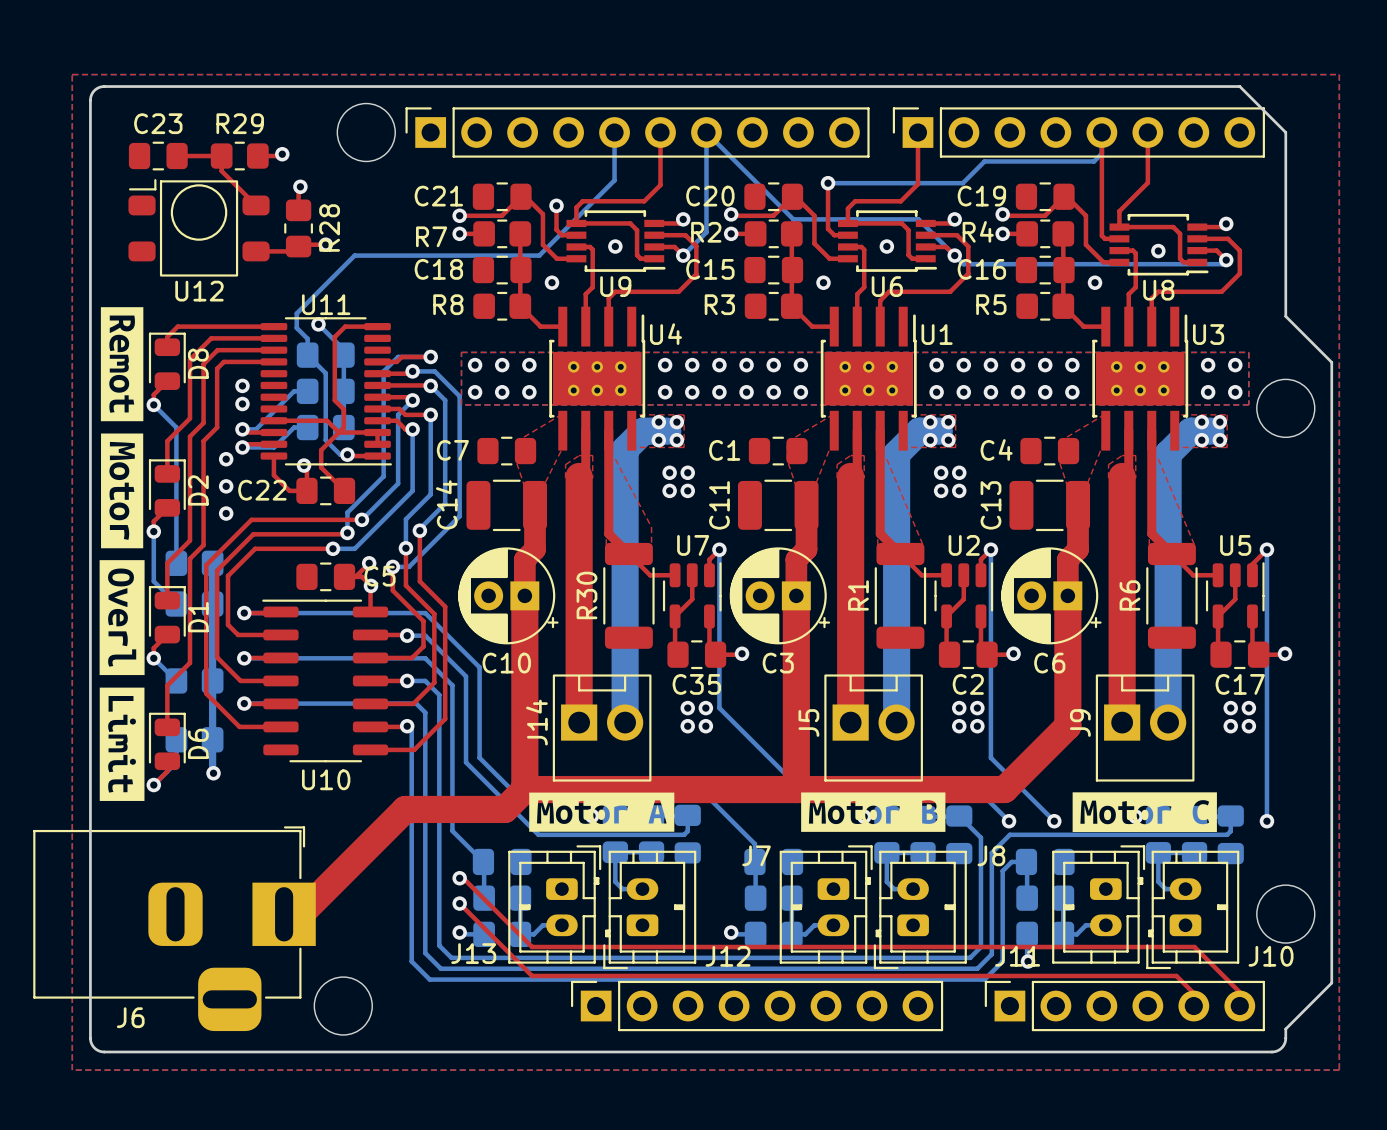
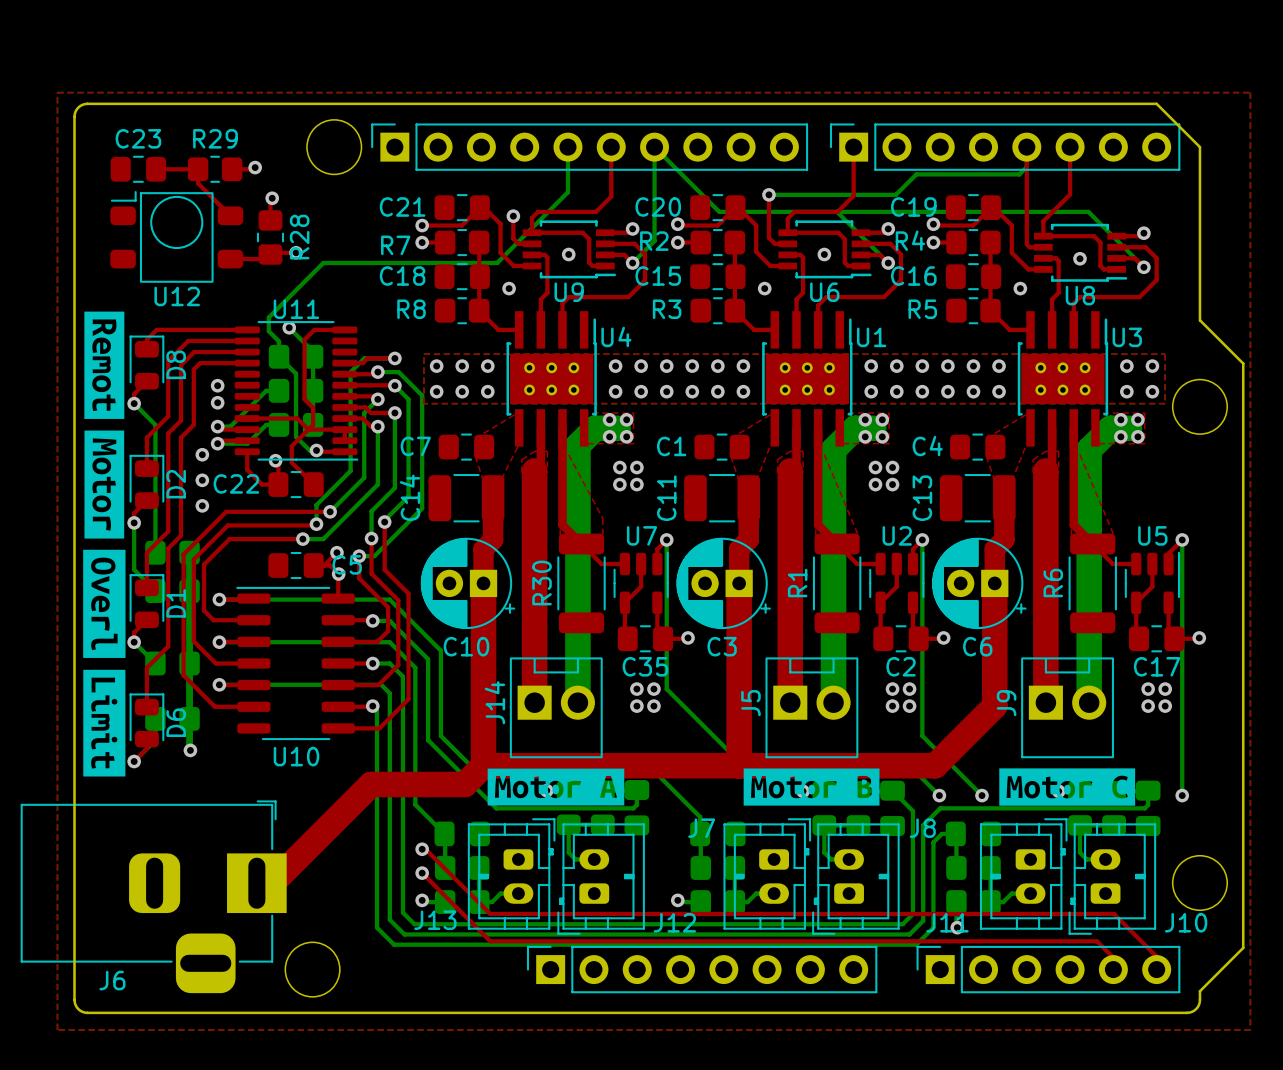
bottom track: (775, 201) (793, 219) (918, 219) -> (837, 211) (854, 228)
bottom track: (954, 255) (963, 264) (1222, 264) (1226, 260) -> (719, 211) (1088, 211) (1143, 267)

